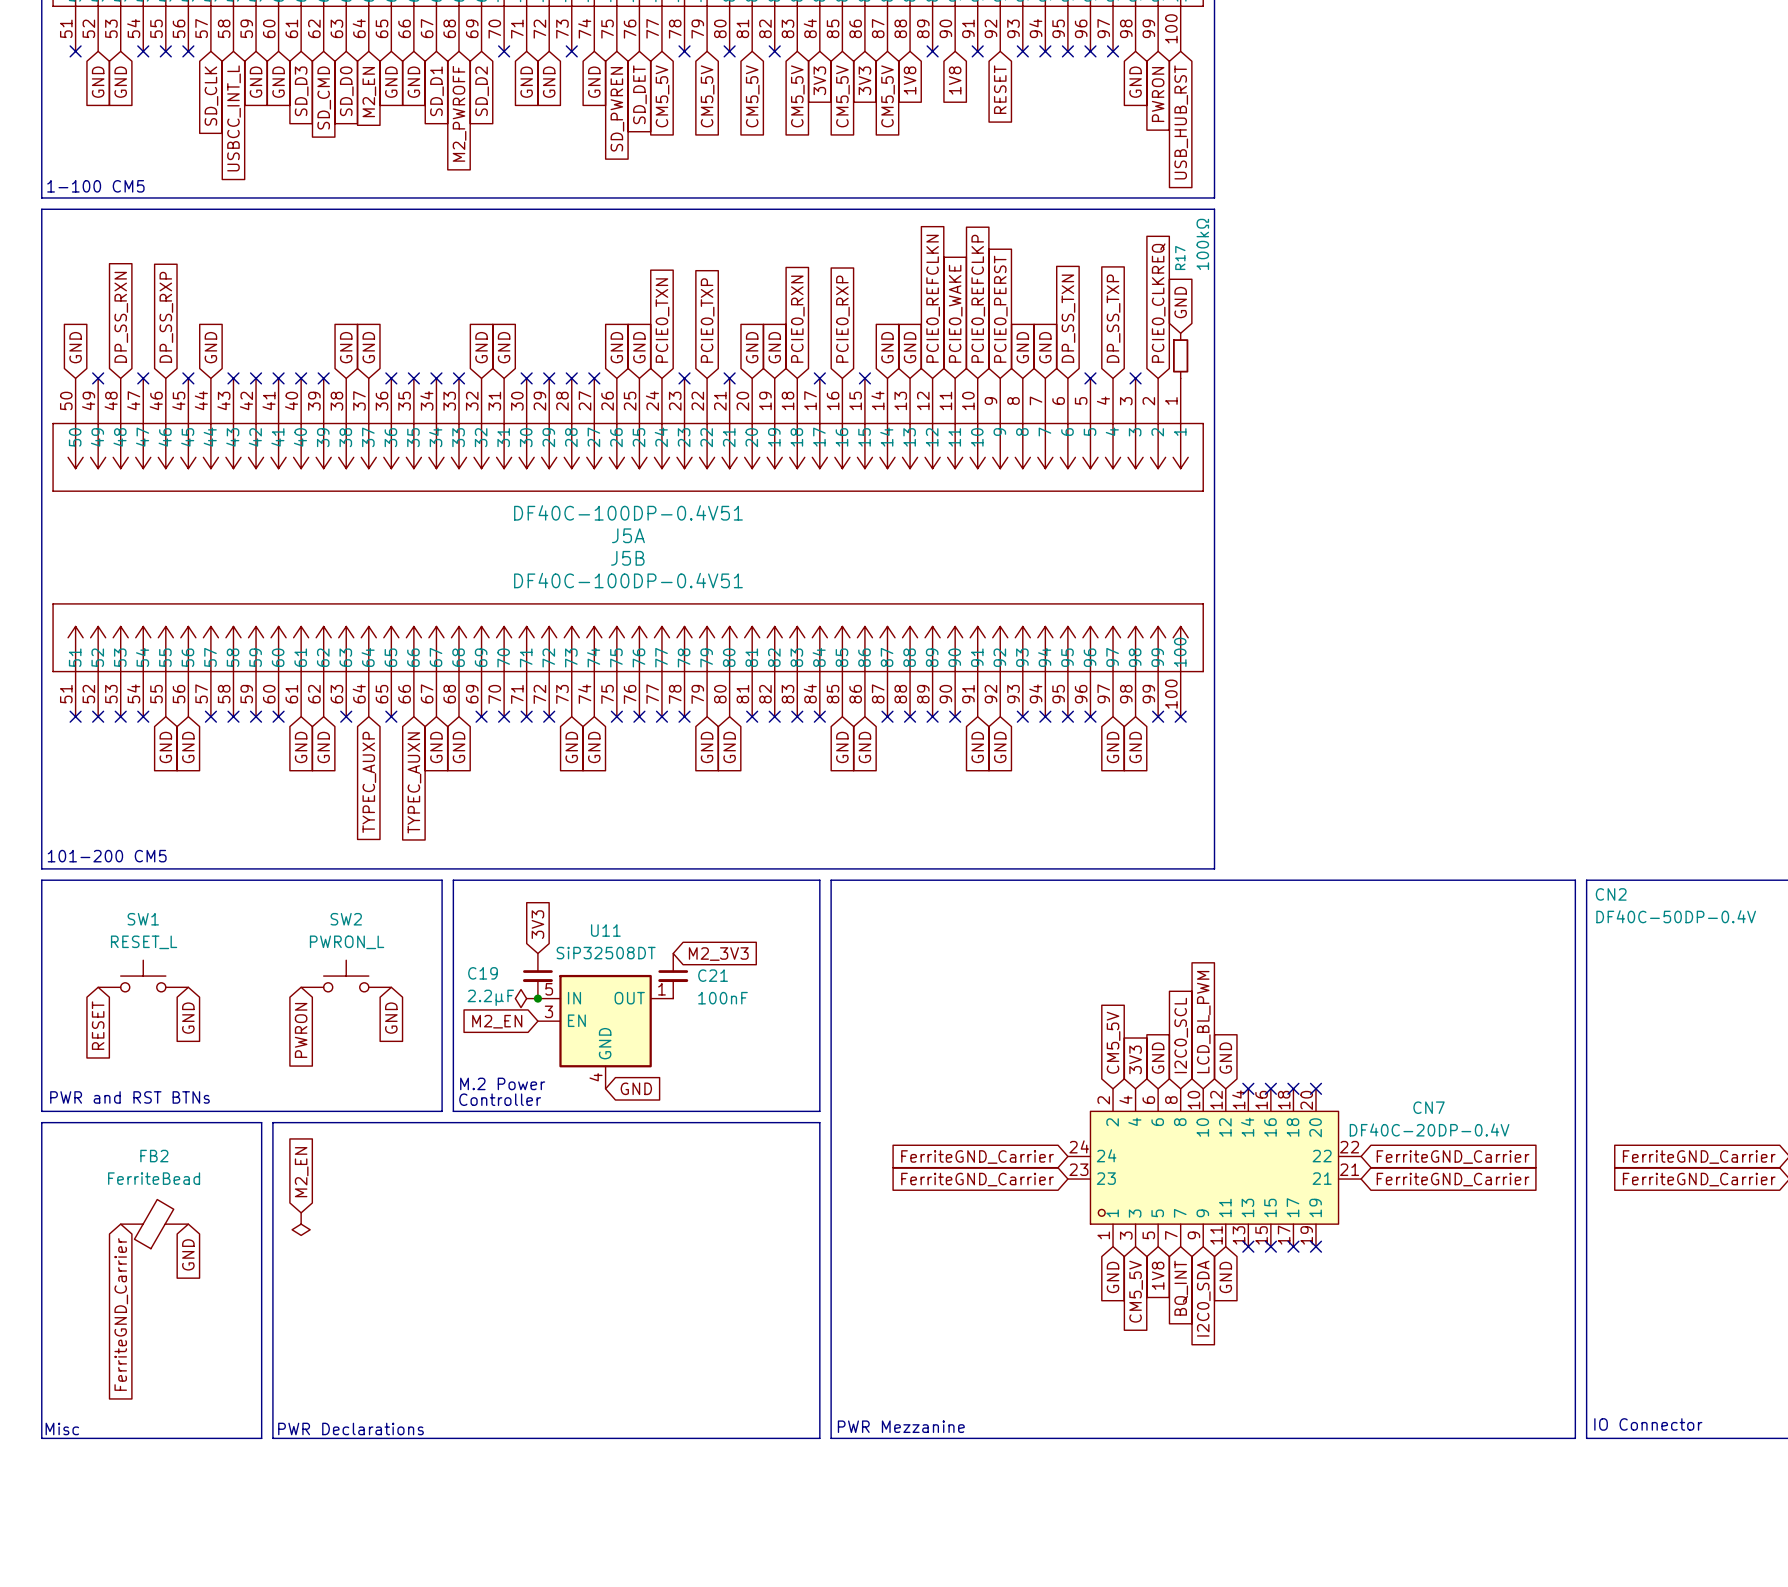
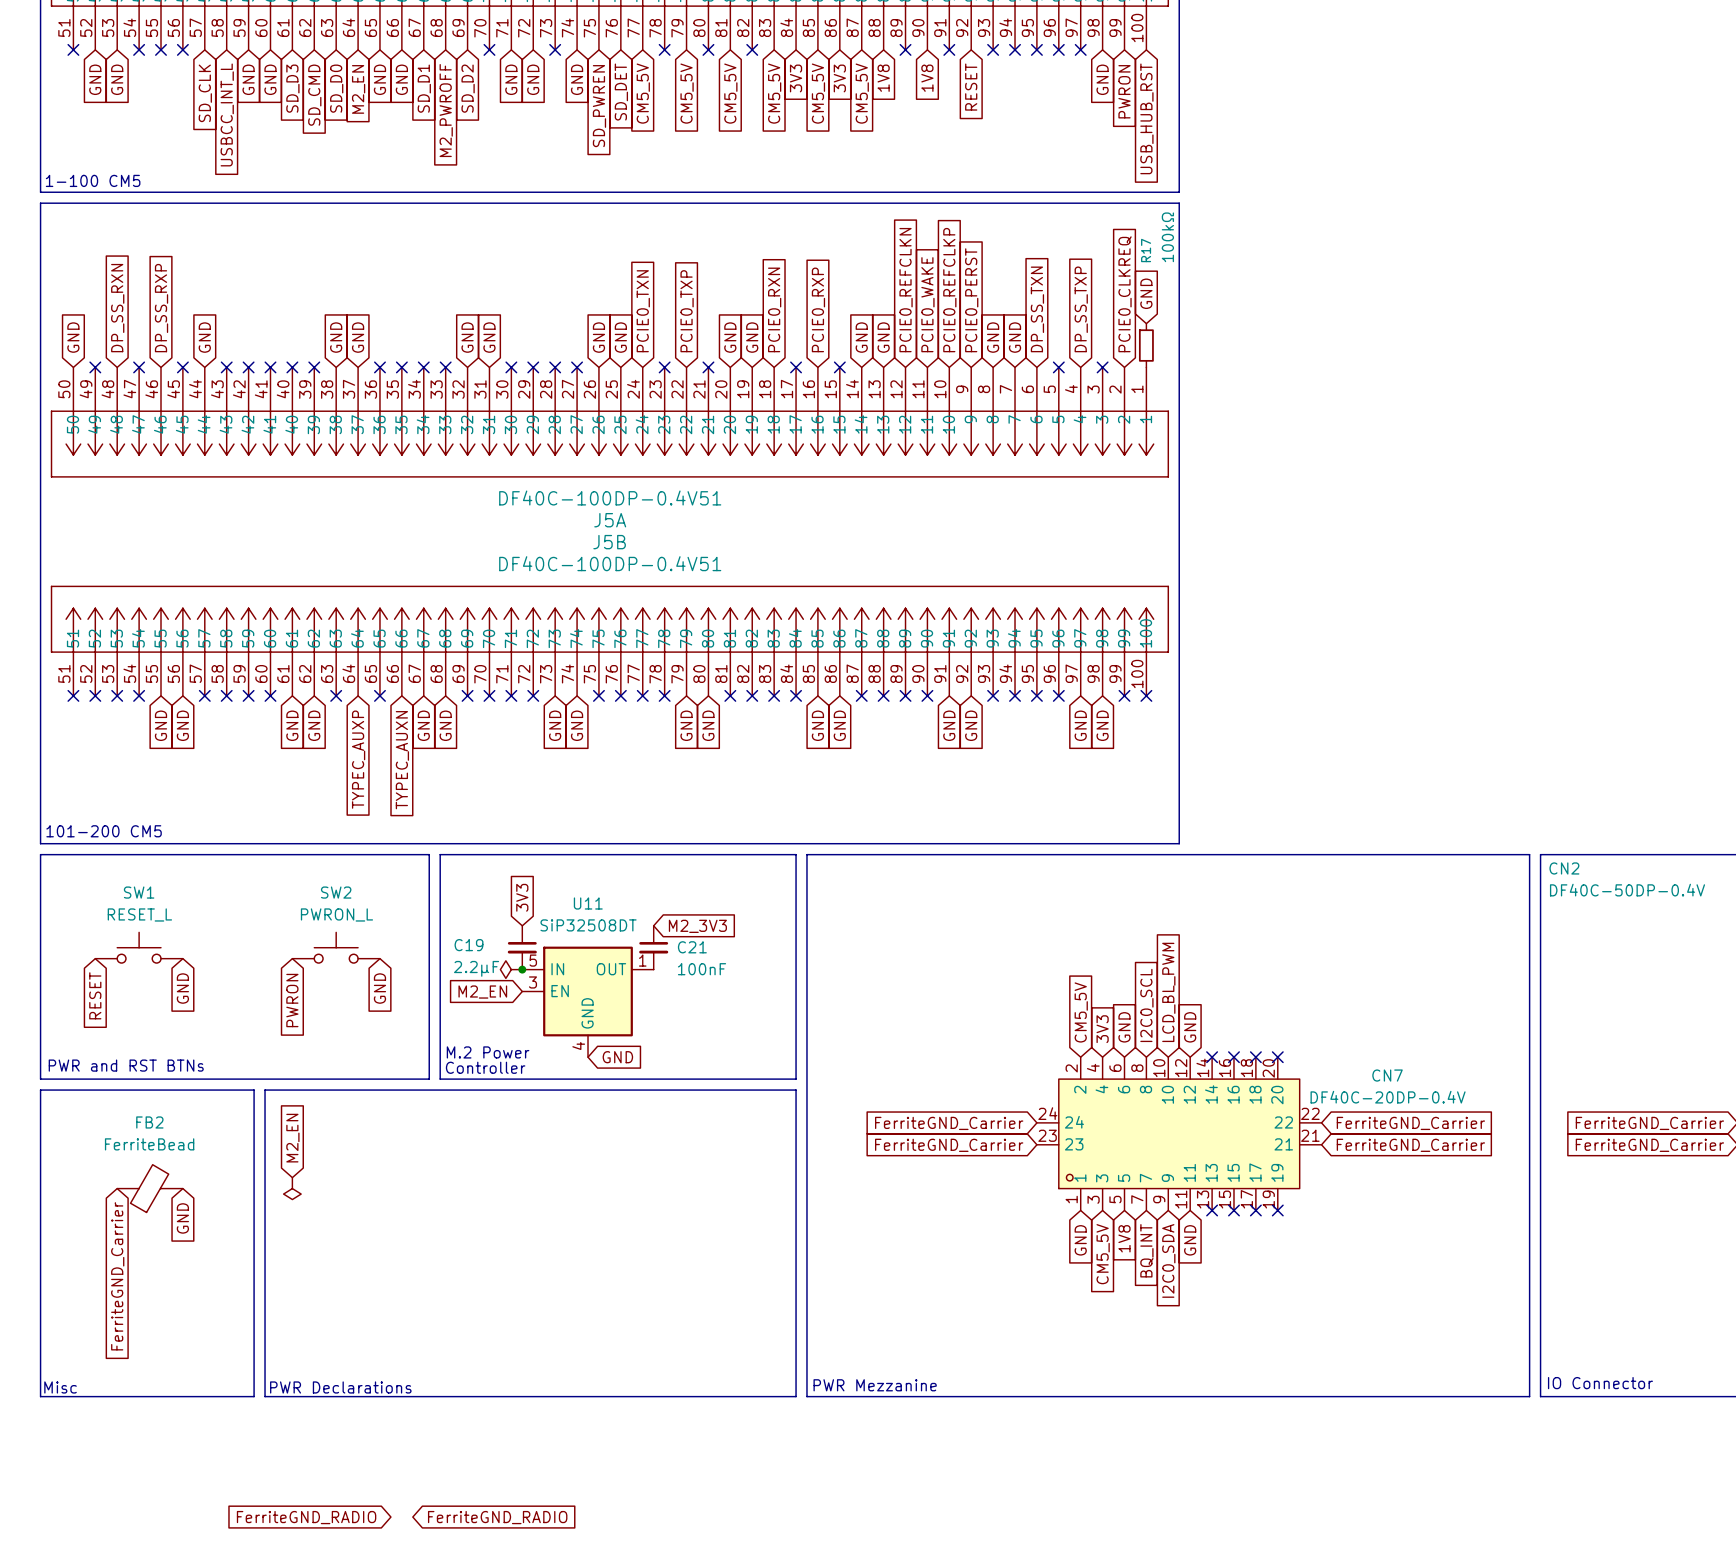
global label: none -> FerriteGND_RADIO (306, 1517)
global label: none -> FerriteGND_RADIO (497, 1517)

